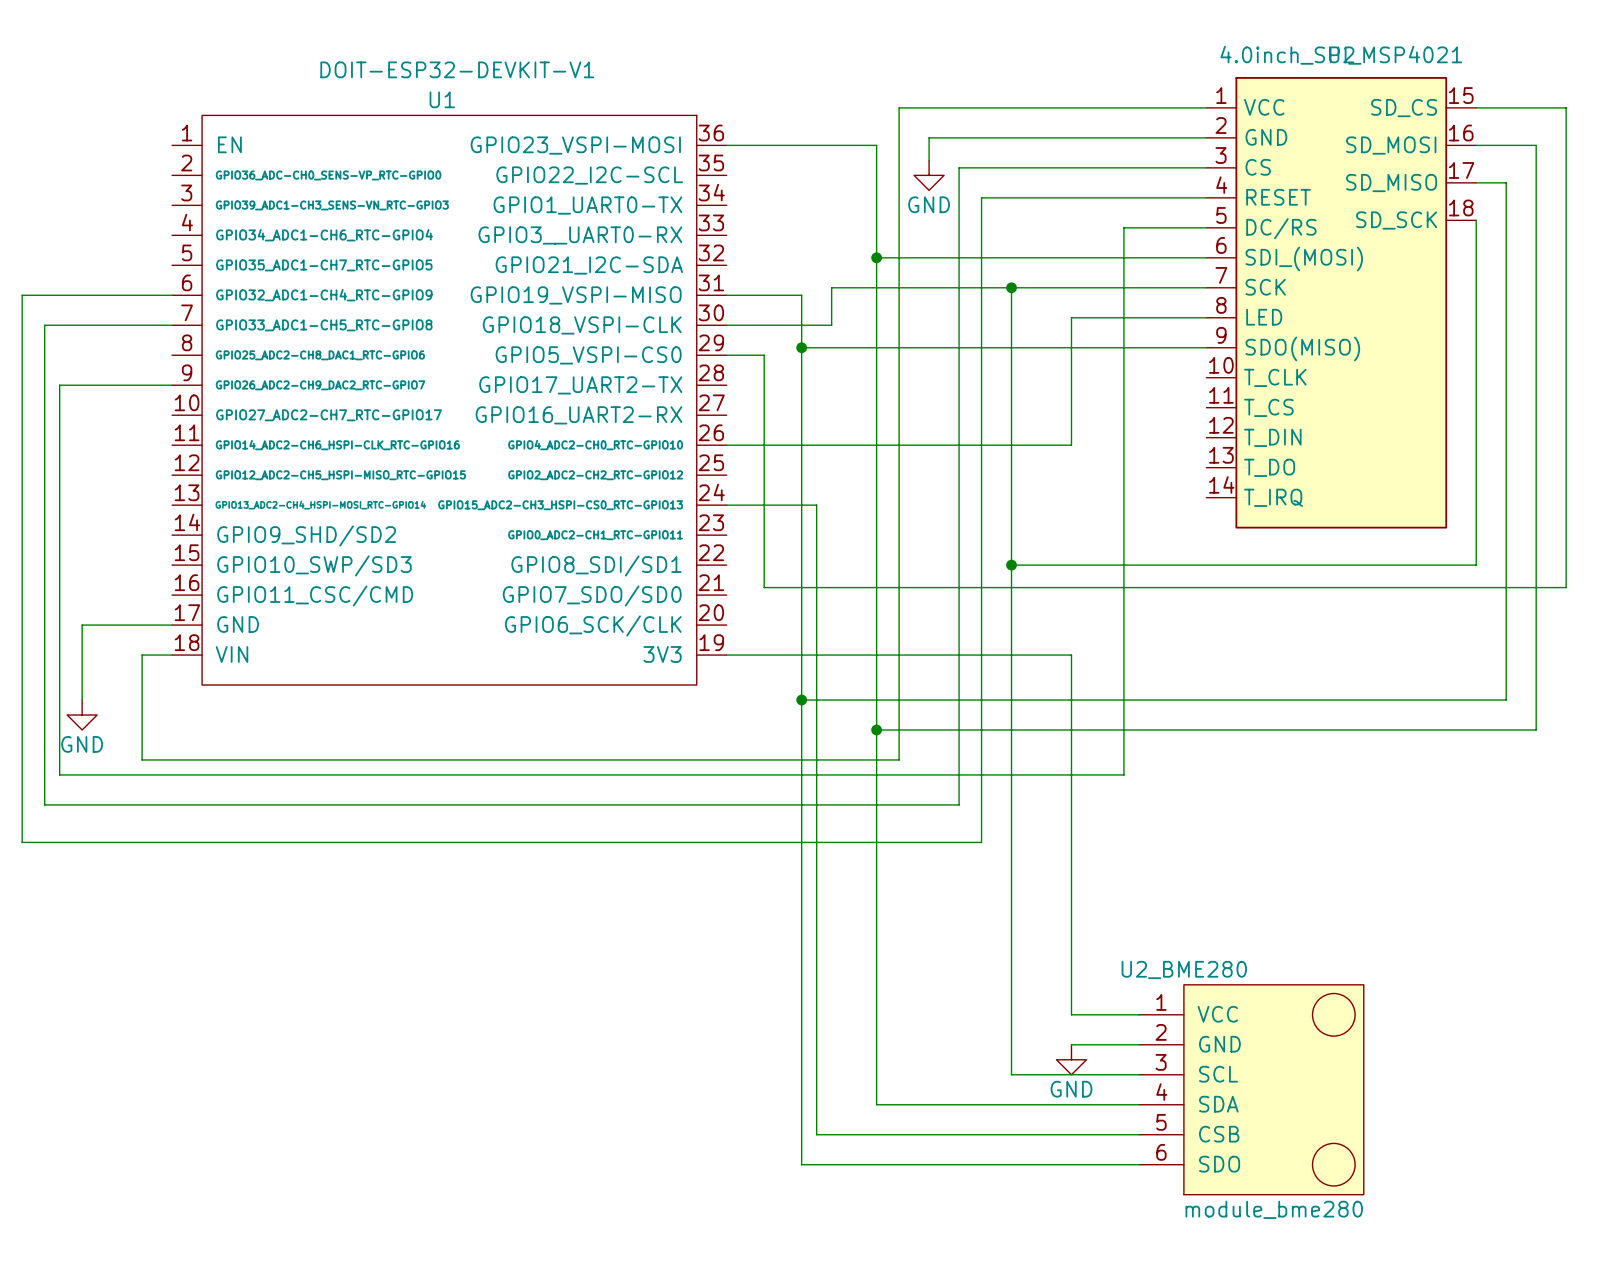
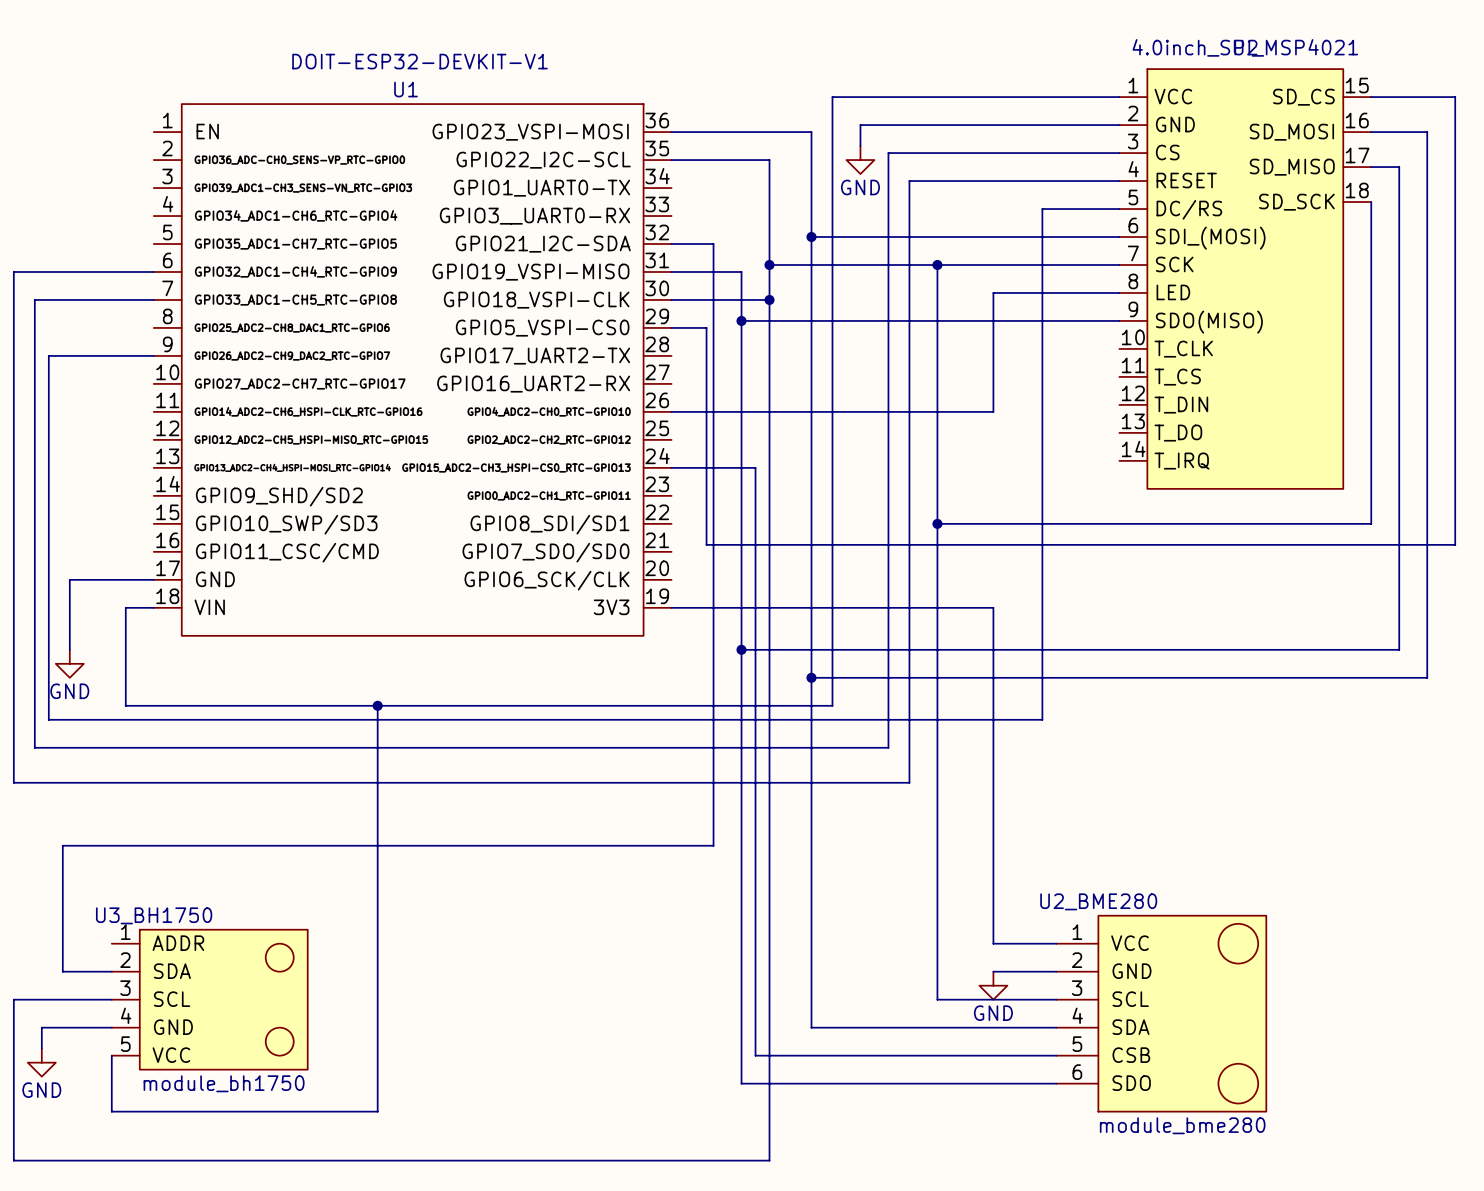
wire: none -> (671, 160) (769, 160) (769, 264)
wire: none -> (671, 244) (713, 244) (713, 845) (62, 845) (62, 971) (111, 971)
junction: none -> (769, 264)
wire: none -> (769, 299) (769, 1160) (13, 1160) (13, 999) (111, 999)
junction: none -> (769, 299)
wire: none -> (377, 705) (377, 1111) (111, 1111) (111, 1055)
junction: none -> (377, 705)
U3_BH1750: none -> module_bh1750 (209, 999)
wire: none -> (111, 1027) (41, 1027) (41, 1048)
power symbol: none -> GND (41, 1062)

